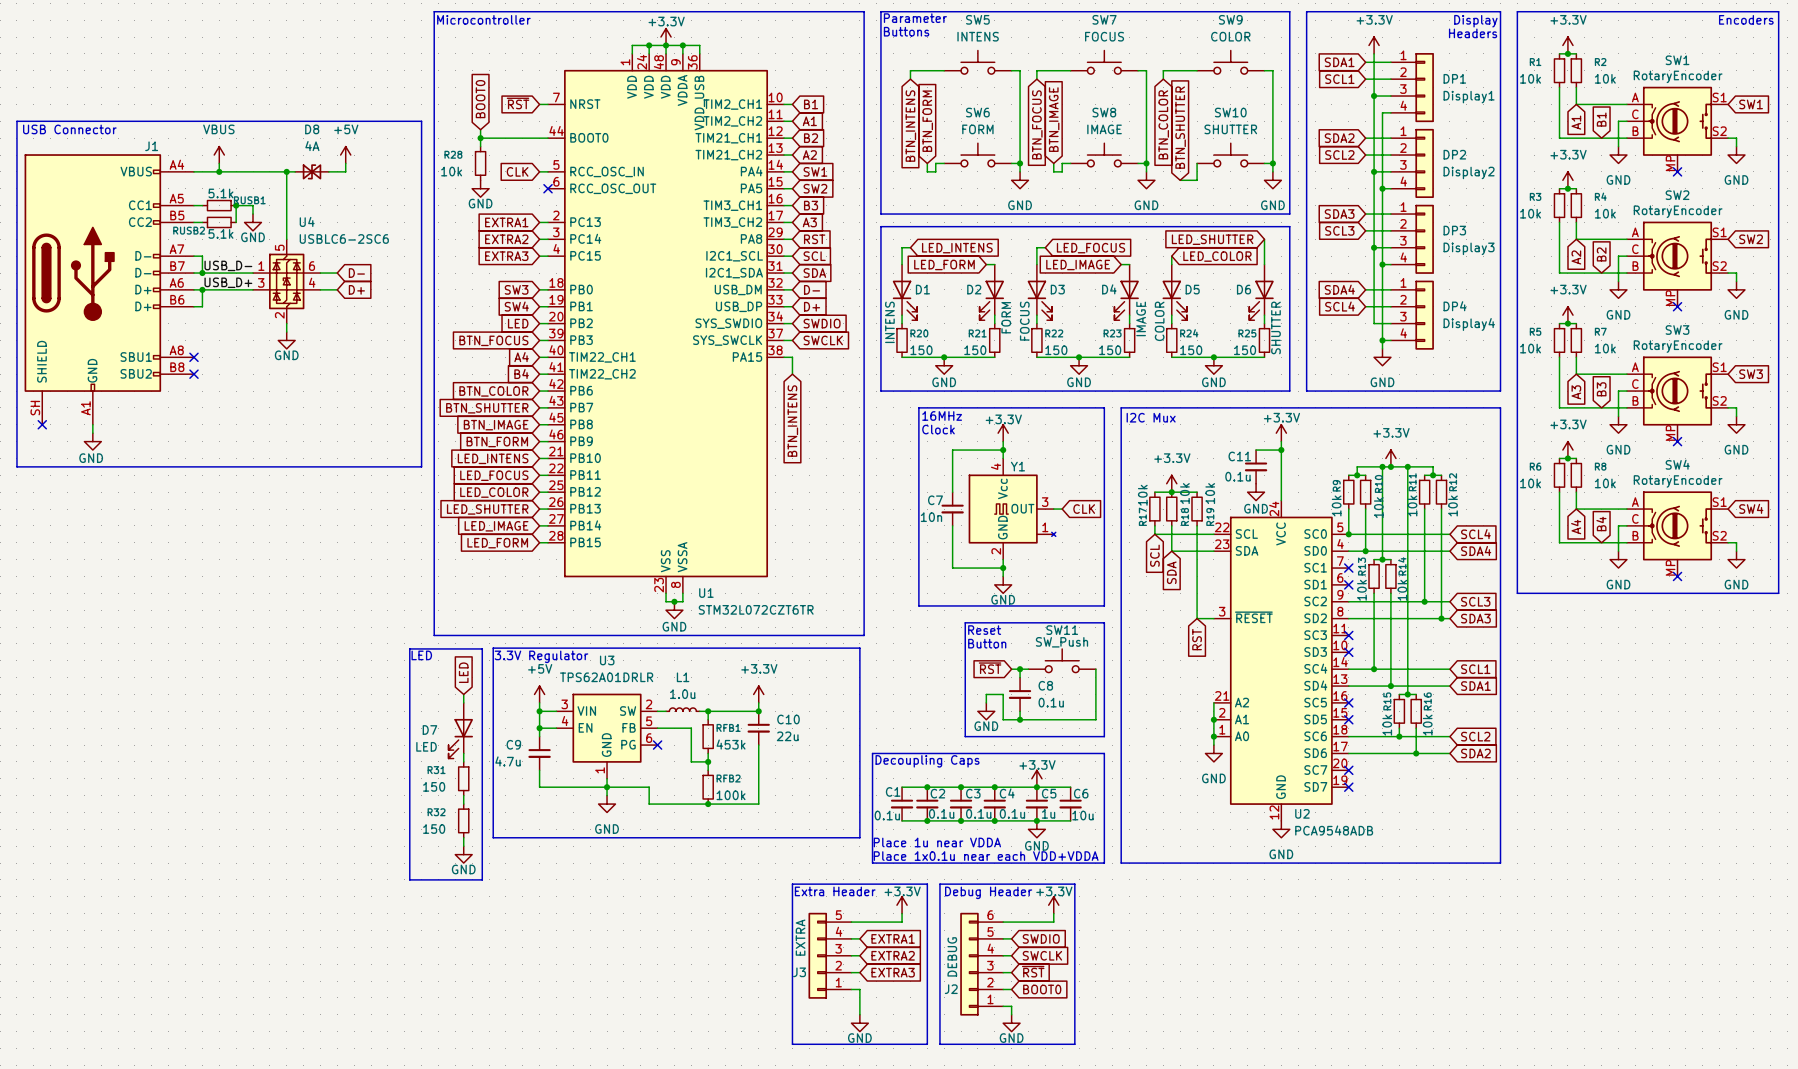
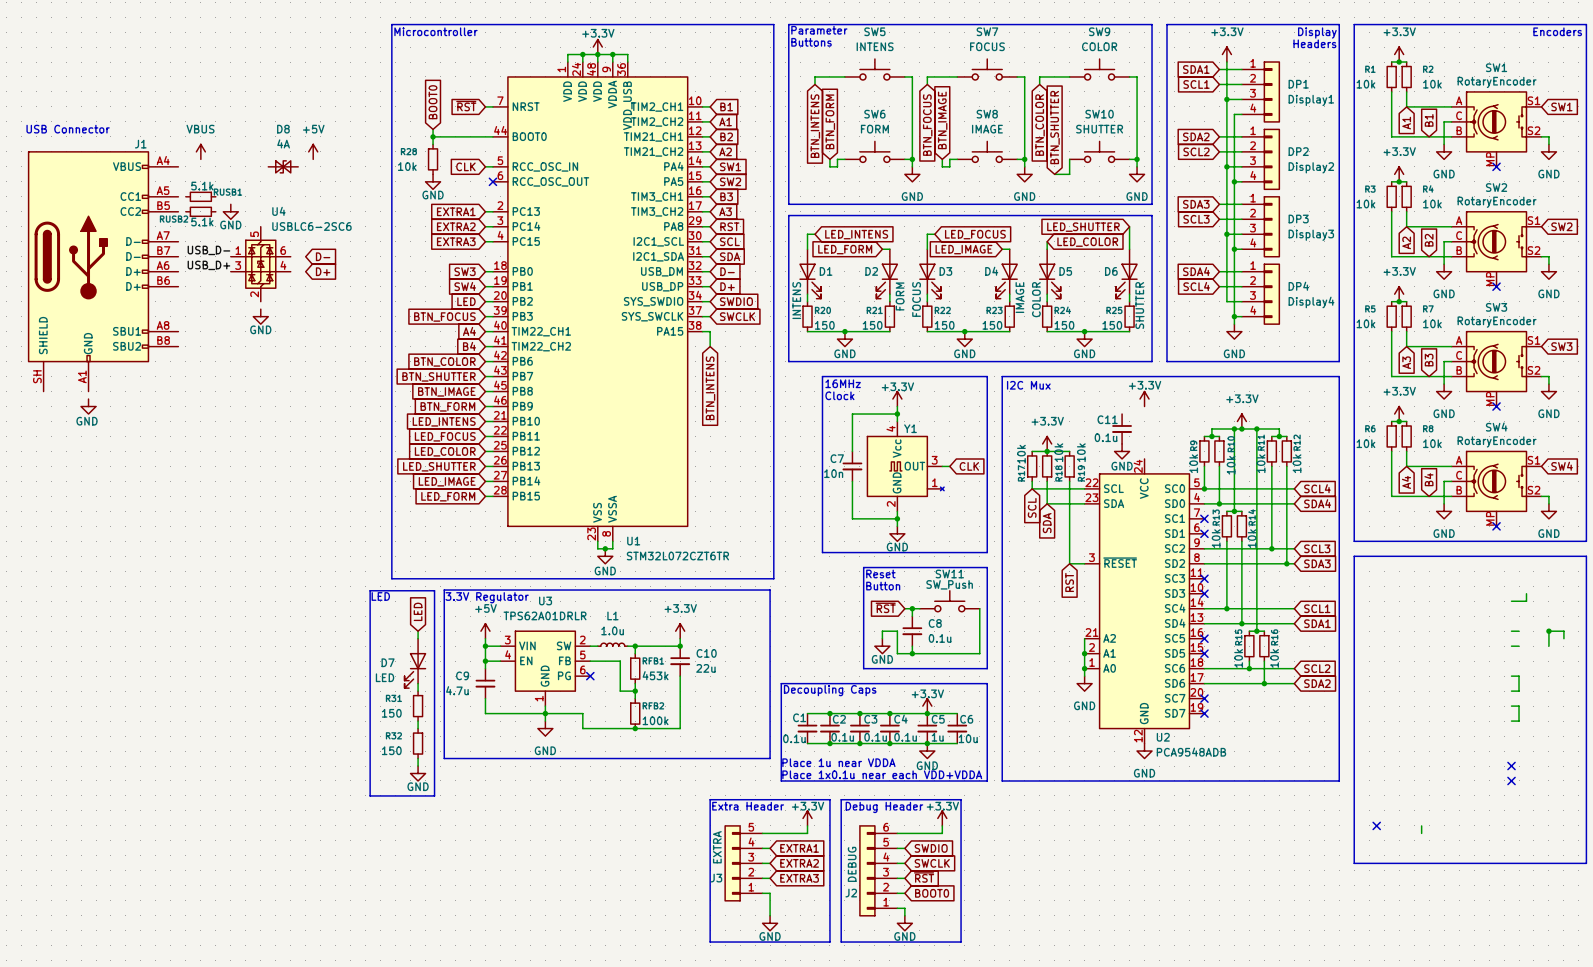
line: (16, 121) (421, 121) (421, 466) (16, 466) (16, 121) -> none
wire: (219, 163) (219, 171) -> none
wire: (345, 163) (345, 171) (328, 171) -> none
wire: (193, 171) (295, 171) -> none
junction: (219, 171) -> none
wire: (286, 171) (286, 239) -> none
junction: (286, 171) -> none
wire: (193, 205) (202, 205) -> none
junction: (236, 205) -> none
wire: (253, 214) (253, 205) (236, 205) (236, 222) -> none
wire: (193, 222) (202, 222) -> none
wire: (193, 256) (202, 256) (202, 273) -> none
wire: (193, 273) (253, 273) -> none
junction: (202, 273) -> none
wire: (320, 273) (337, 273) -> none
wire: (193, 289) (253, 289) -> none
wire: (202, 289) (202, 306) (193, 306) -> none
junction: (202, 289) -> none
wire: (320, 289) (337, 289) -> none
wire: (286, 323) (286, 332) -> none
no-connect mark: (193, 357) -> none
no-connect mark: (193, 374) -> none
no-connect mark: (42, 424) -> none
wire: (92, 424) (92, 433) -> none
wire: (1281, 441) (1281, 500) -> none
wire: (1256, 450) (1281, 450) -> none
junction: (1281, 450) -> none
line: none -> (1354, 556) (1354, 863) (1586, 863) (1586, 556) (1354, 556)
wire: none -> (1526, 593) (1526, 601) (1511, 601)
wire: none -> (1511, 631) (1519, 631)
junction: none -> (1548, 631)
wire: none -> (1563, 638) (1563, 631) (1548, 631) (1548, 646)
wire: none -> (1511, 646) (1519, 646)
wire: none -> (1511, 676) (1519, 676) (1519, 691) (1511, 691)
wire: none -> (1511, 706) (1519, 706) (1519, 721) (1511, 721)
no-connect mark: none -> (1511, 766)
no-connect mark: none -> (1511, 780)
no-connect mark: none -> (1376, 825)
wire: none -> (1421, 825) (1421, 833)

